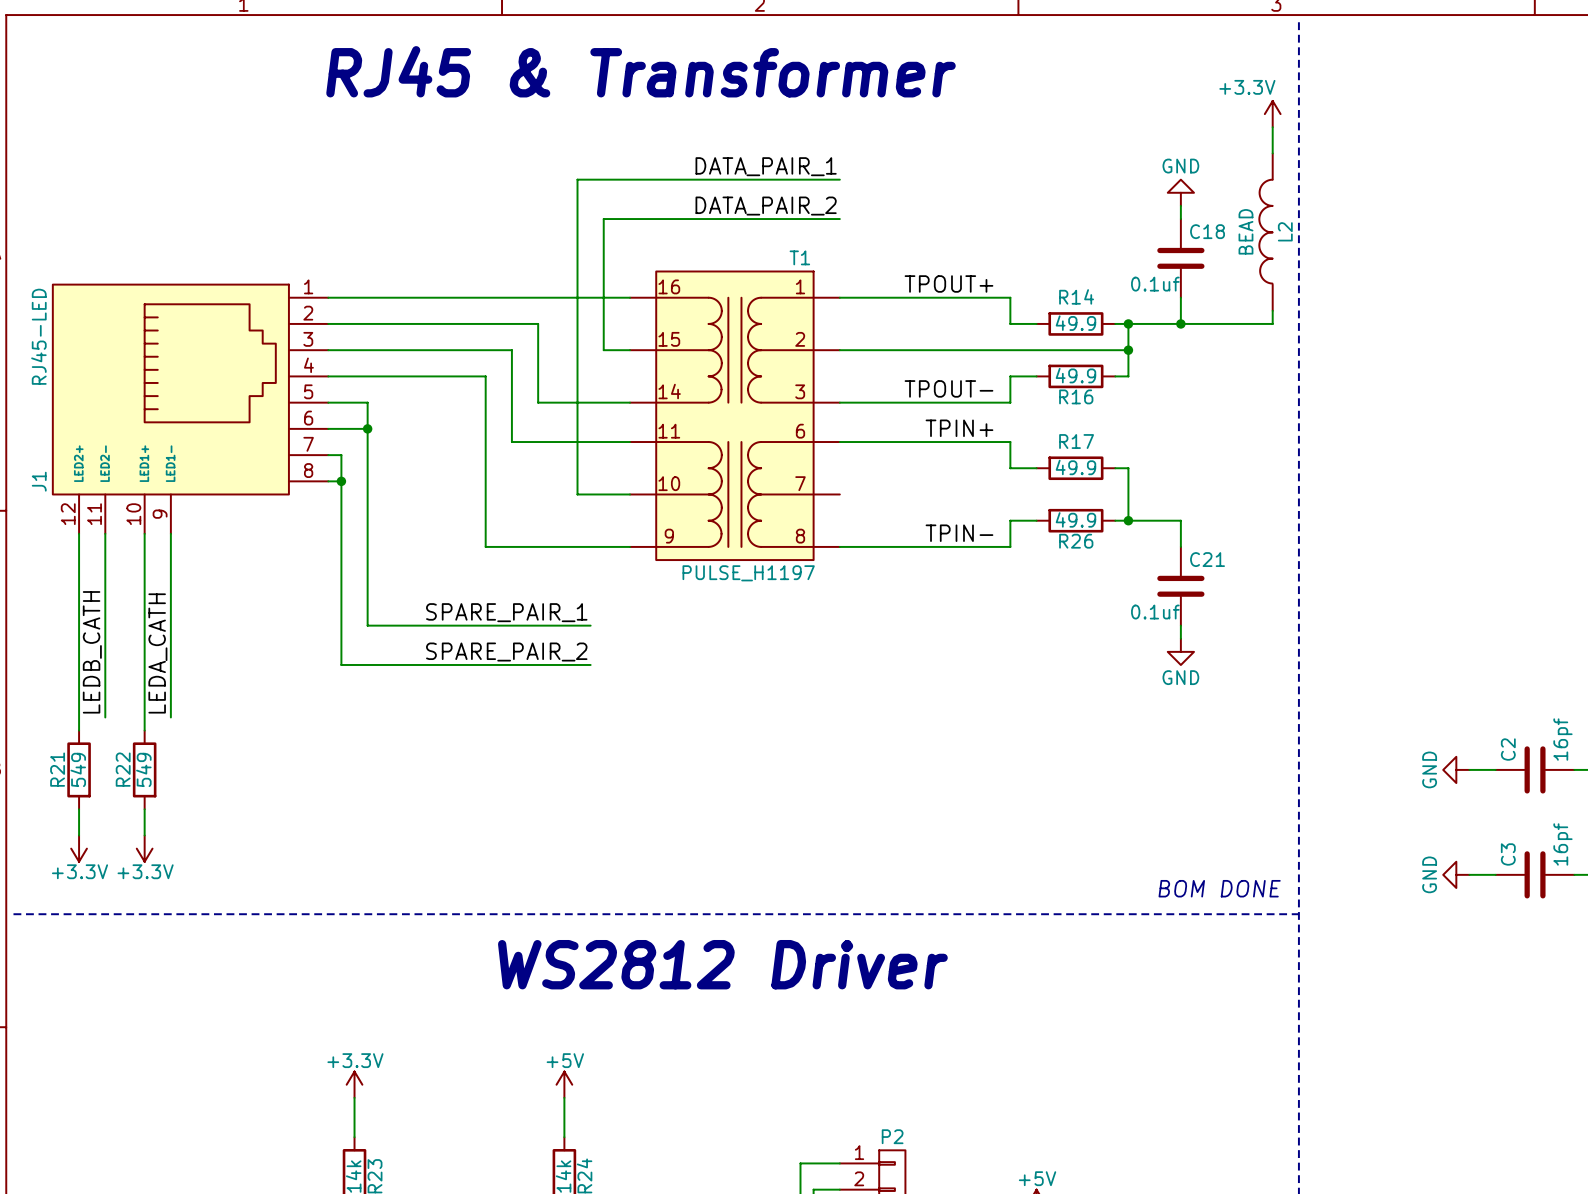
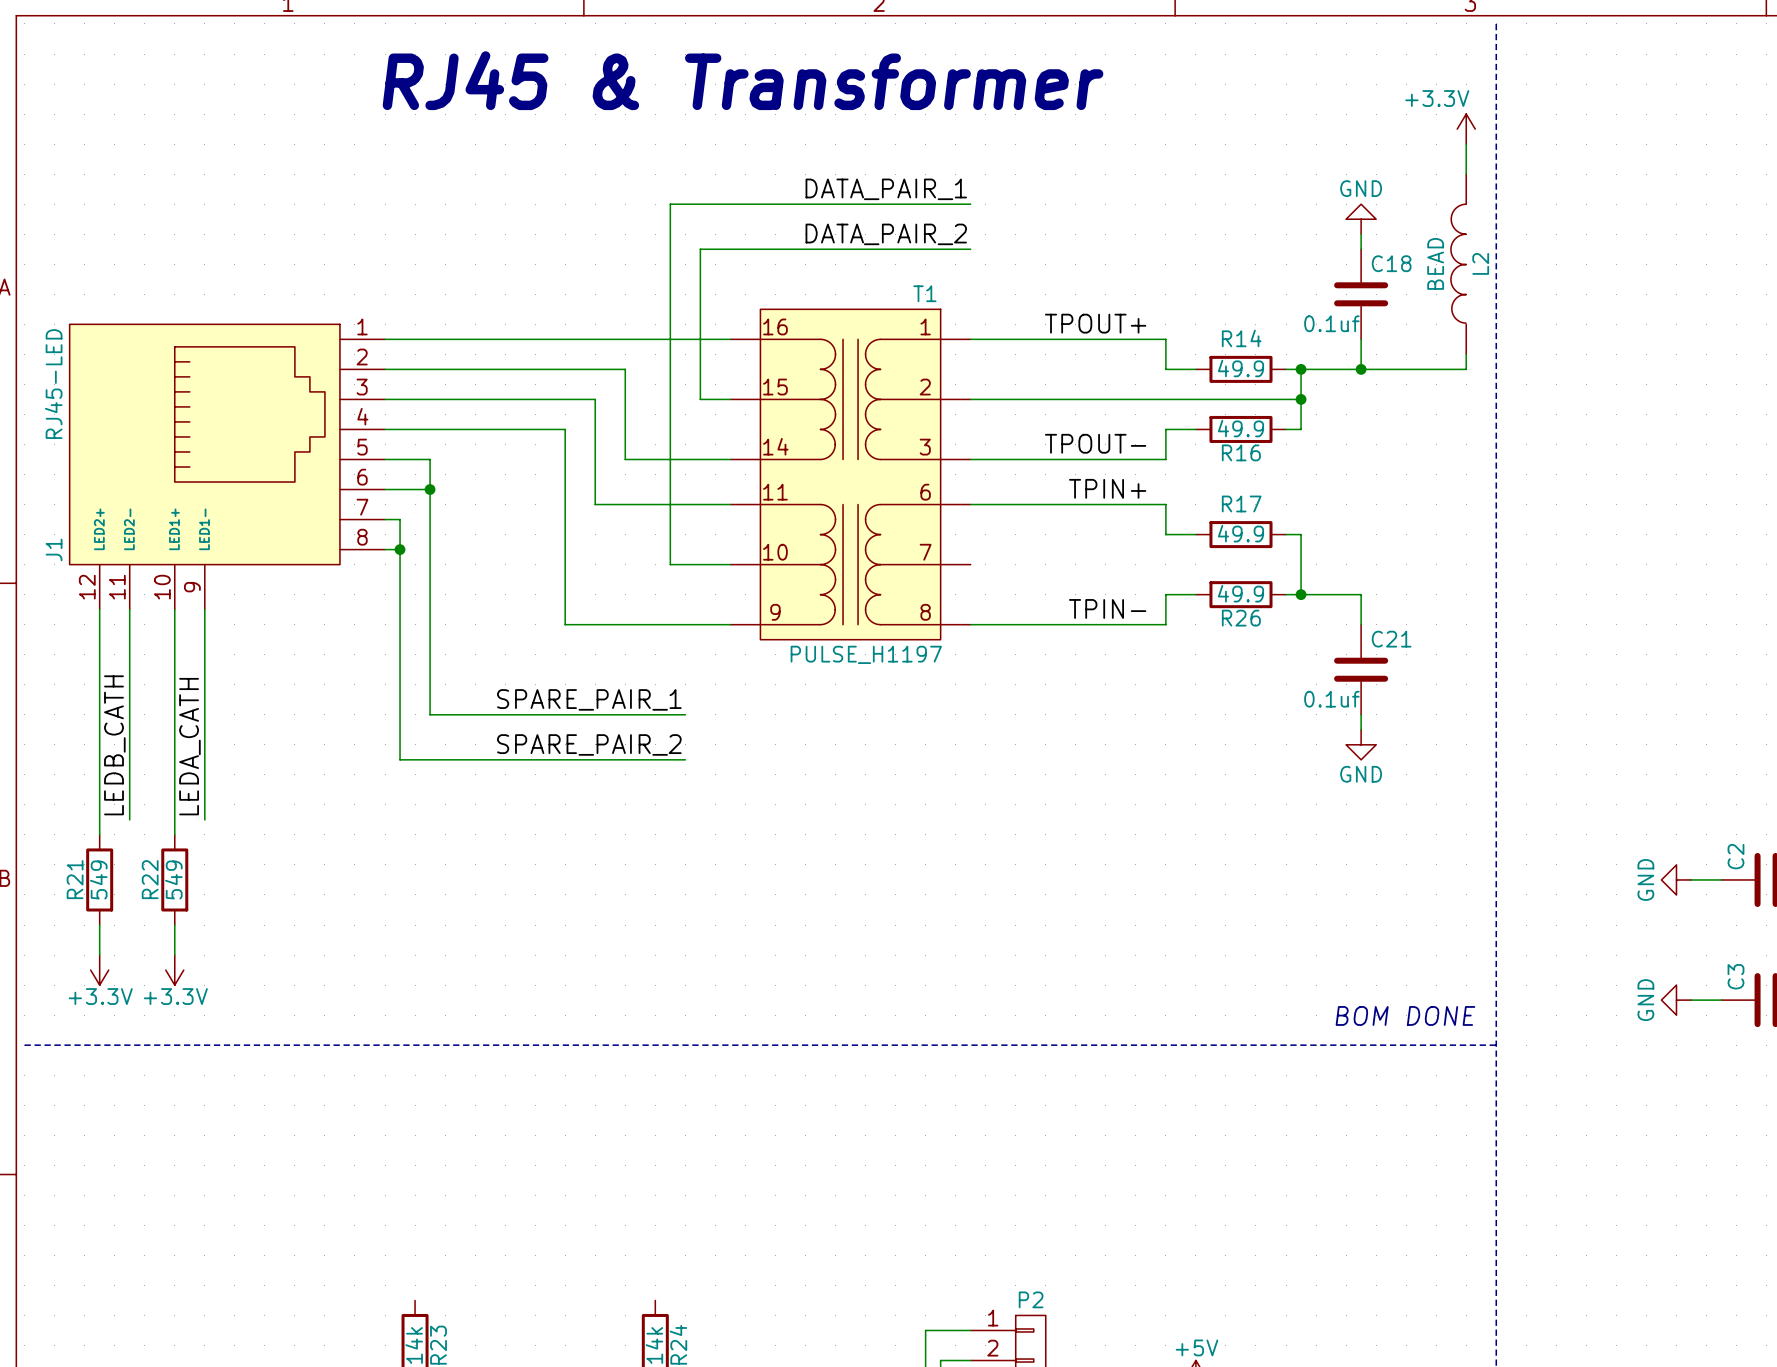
text: WS2812 Driver (722, 964) -> none
power symbol: +3.3V (354, 1084) -> none
power symbol: +5V (564, 1084) -> none
wire: (354, 1097) (354, 1137) -> none
wire: (564, 1097) (564, 1137) -> none

